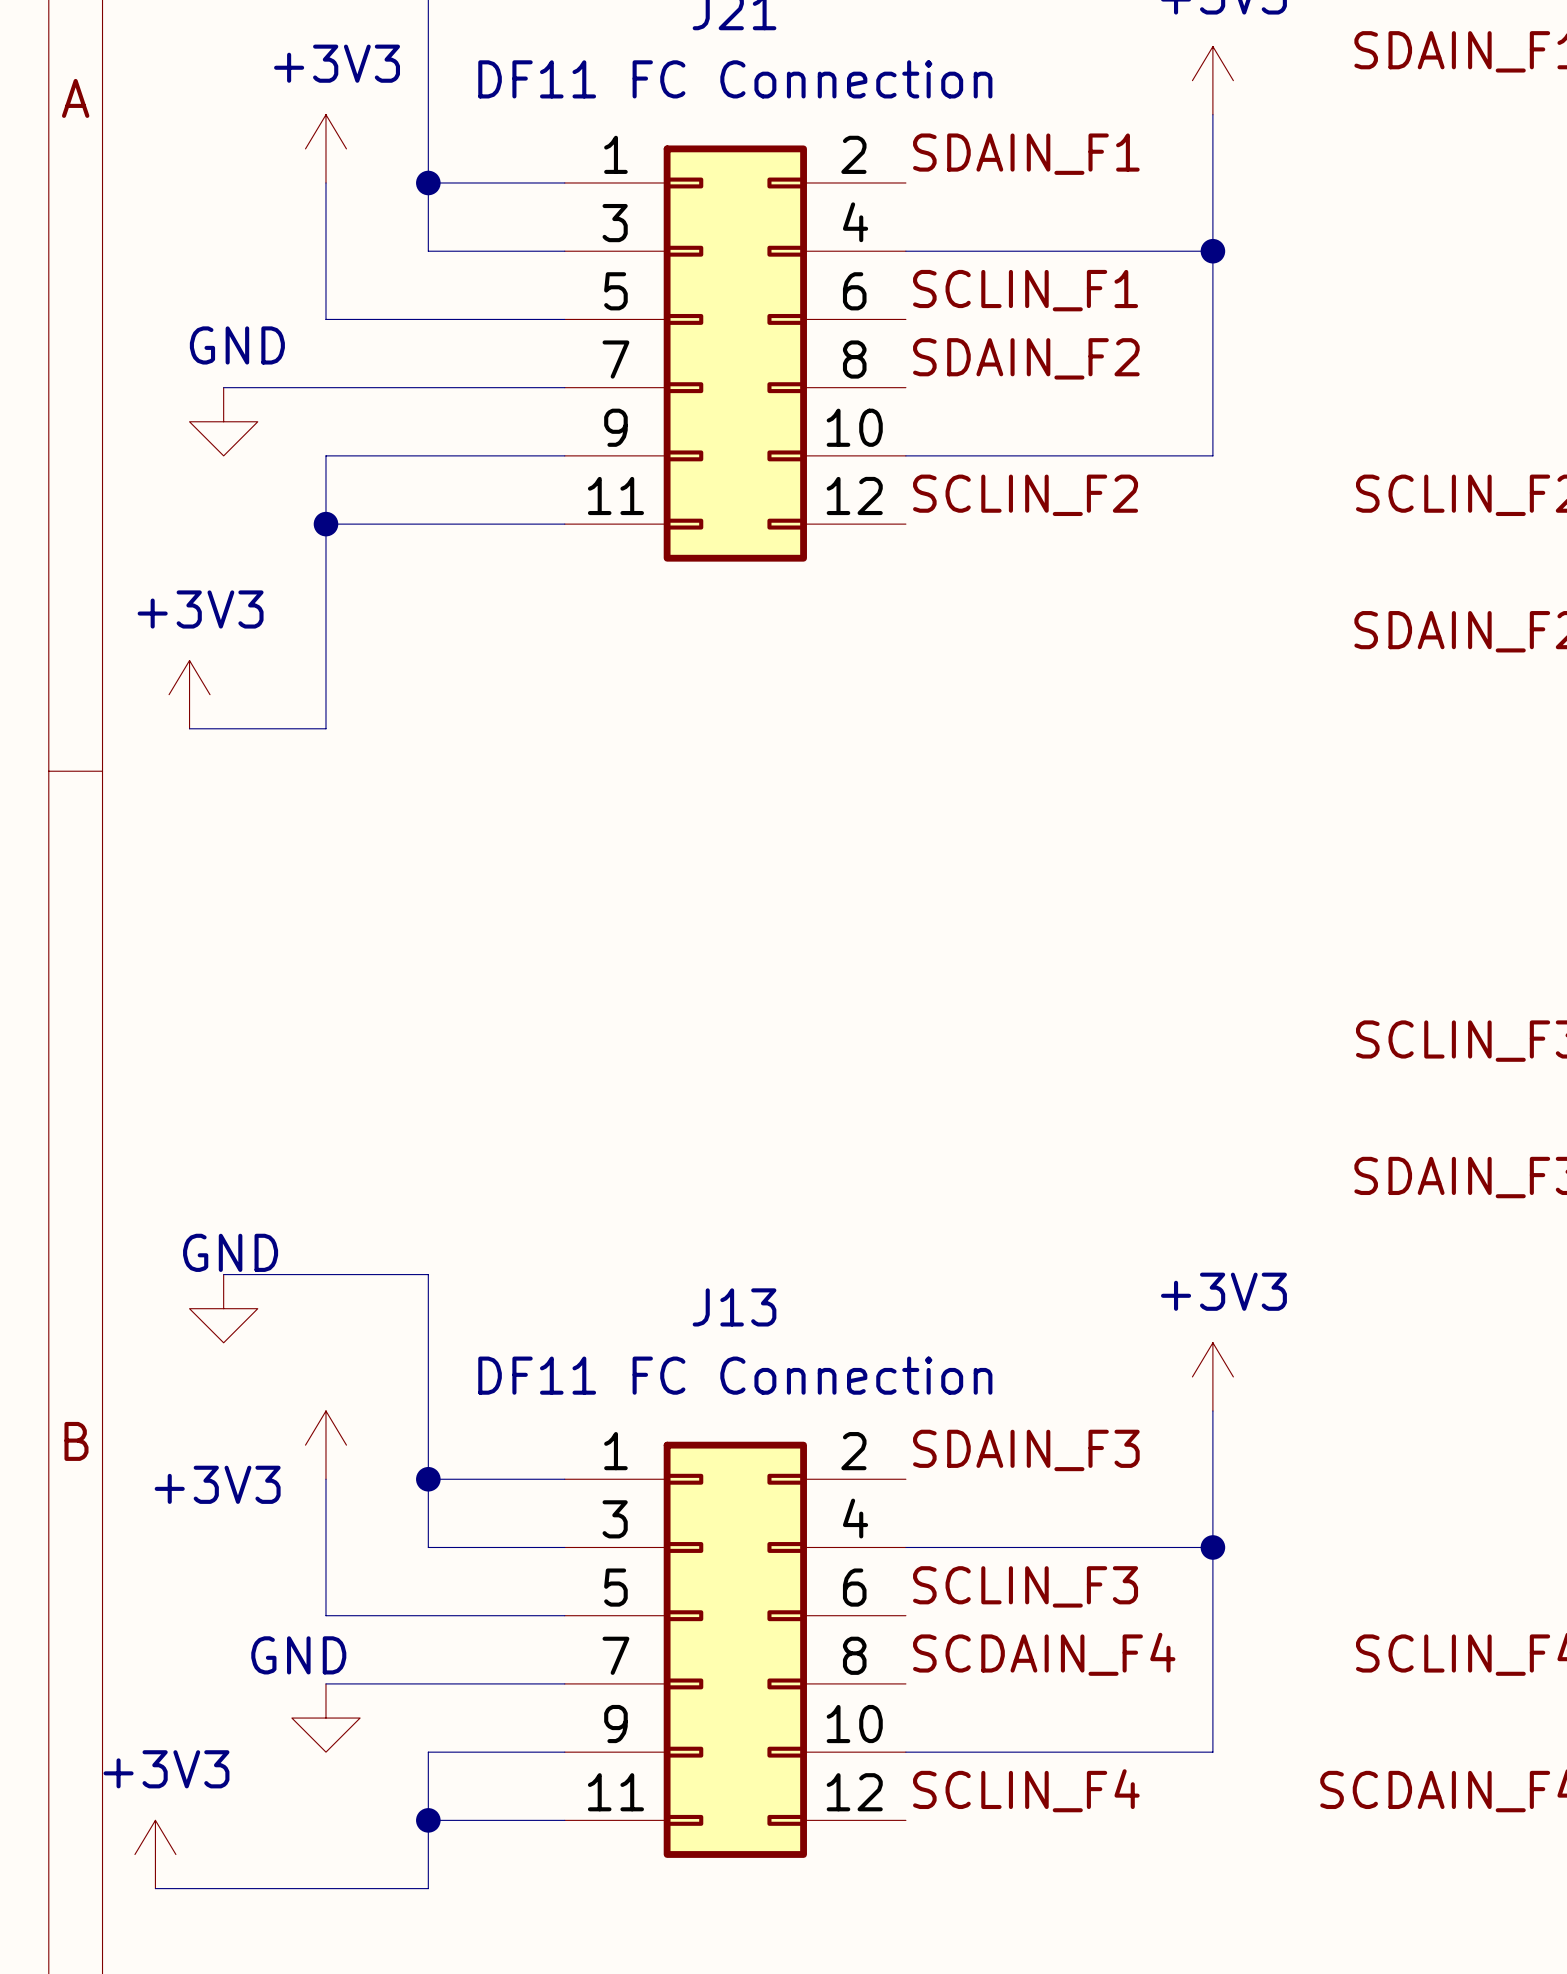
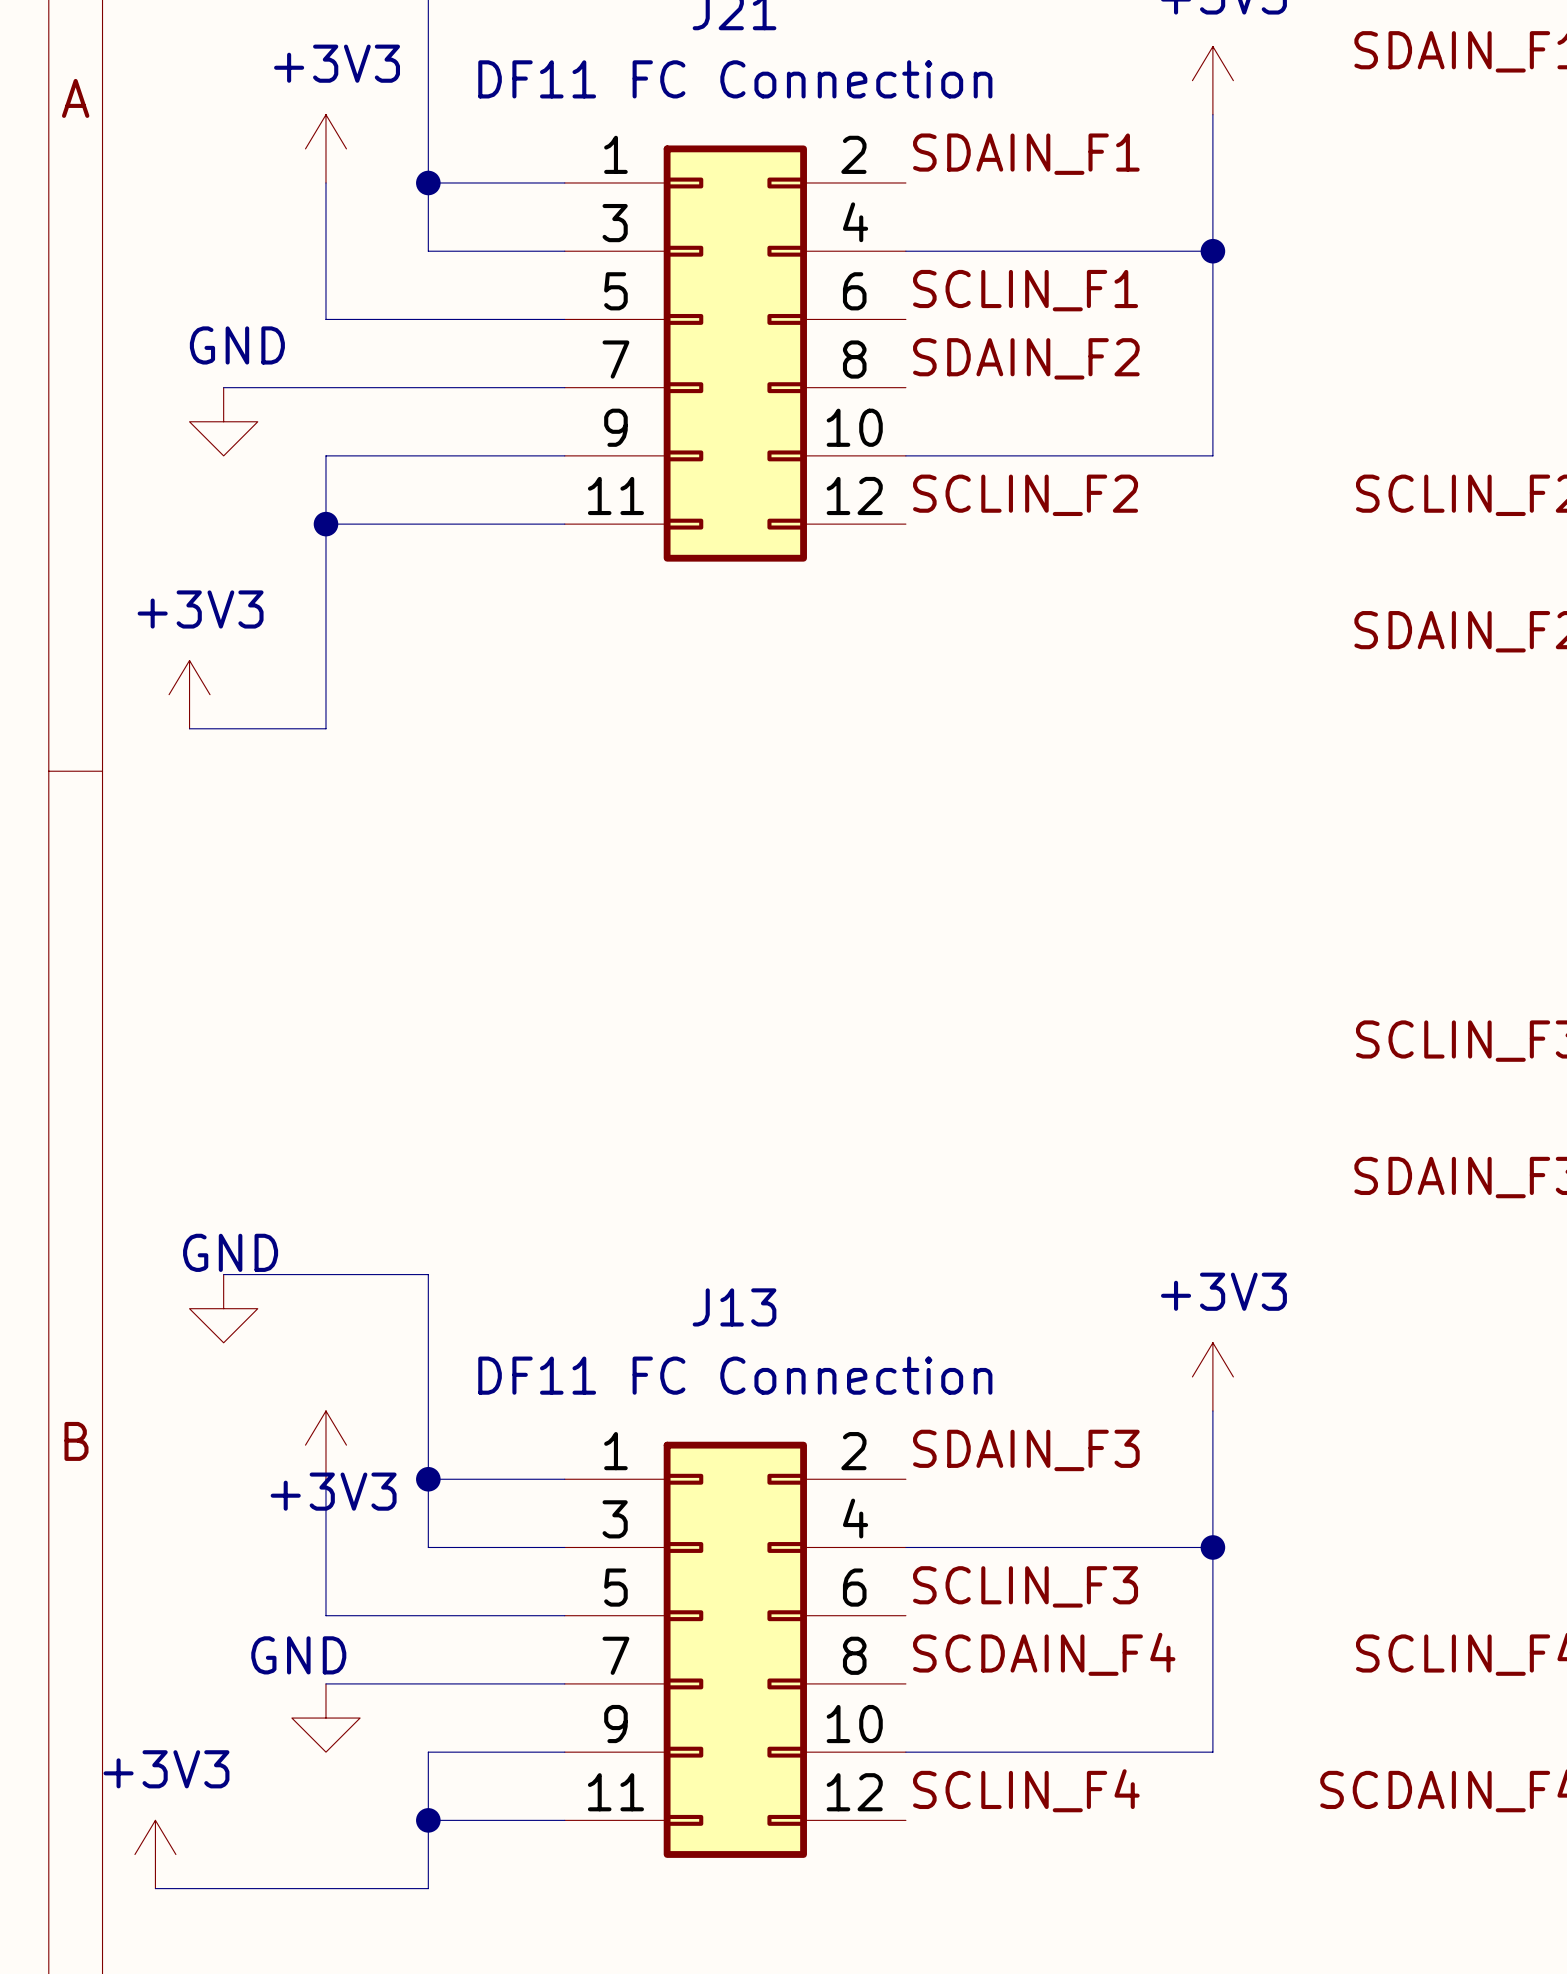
power symbol text position: +3V3 (217, 1484) -> +3V3 (333, 1491)

